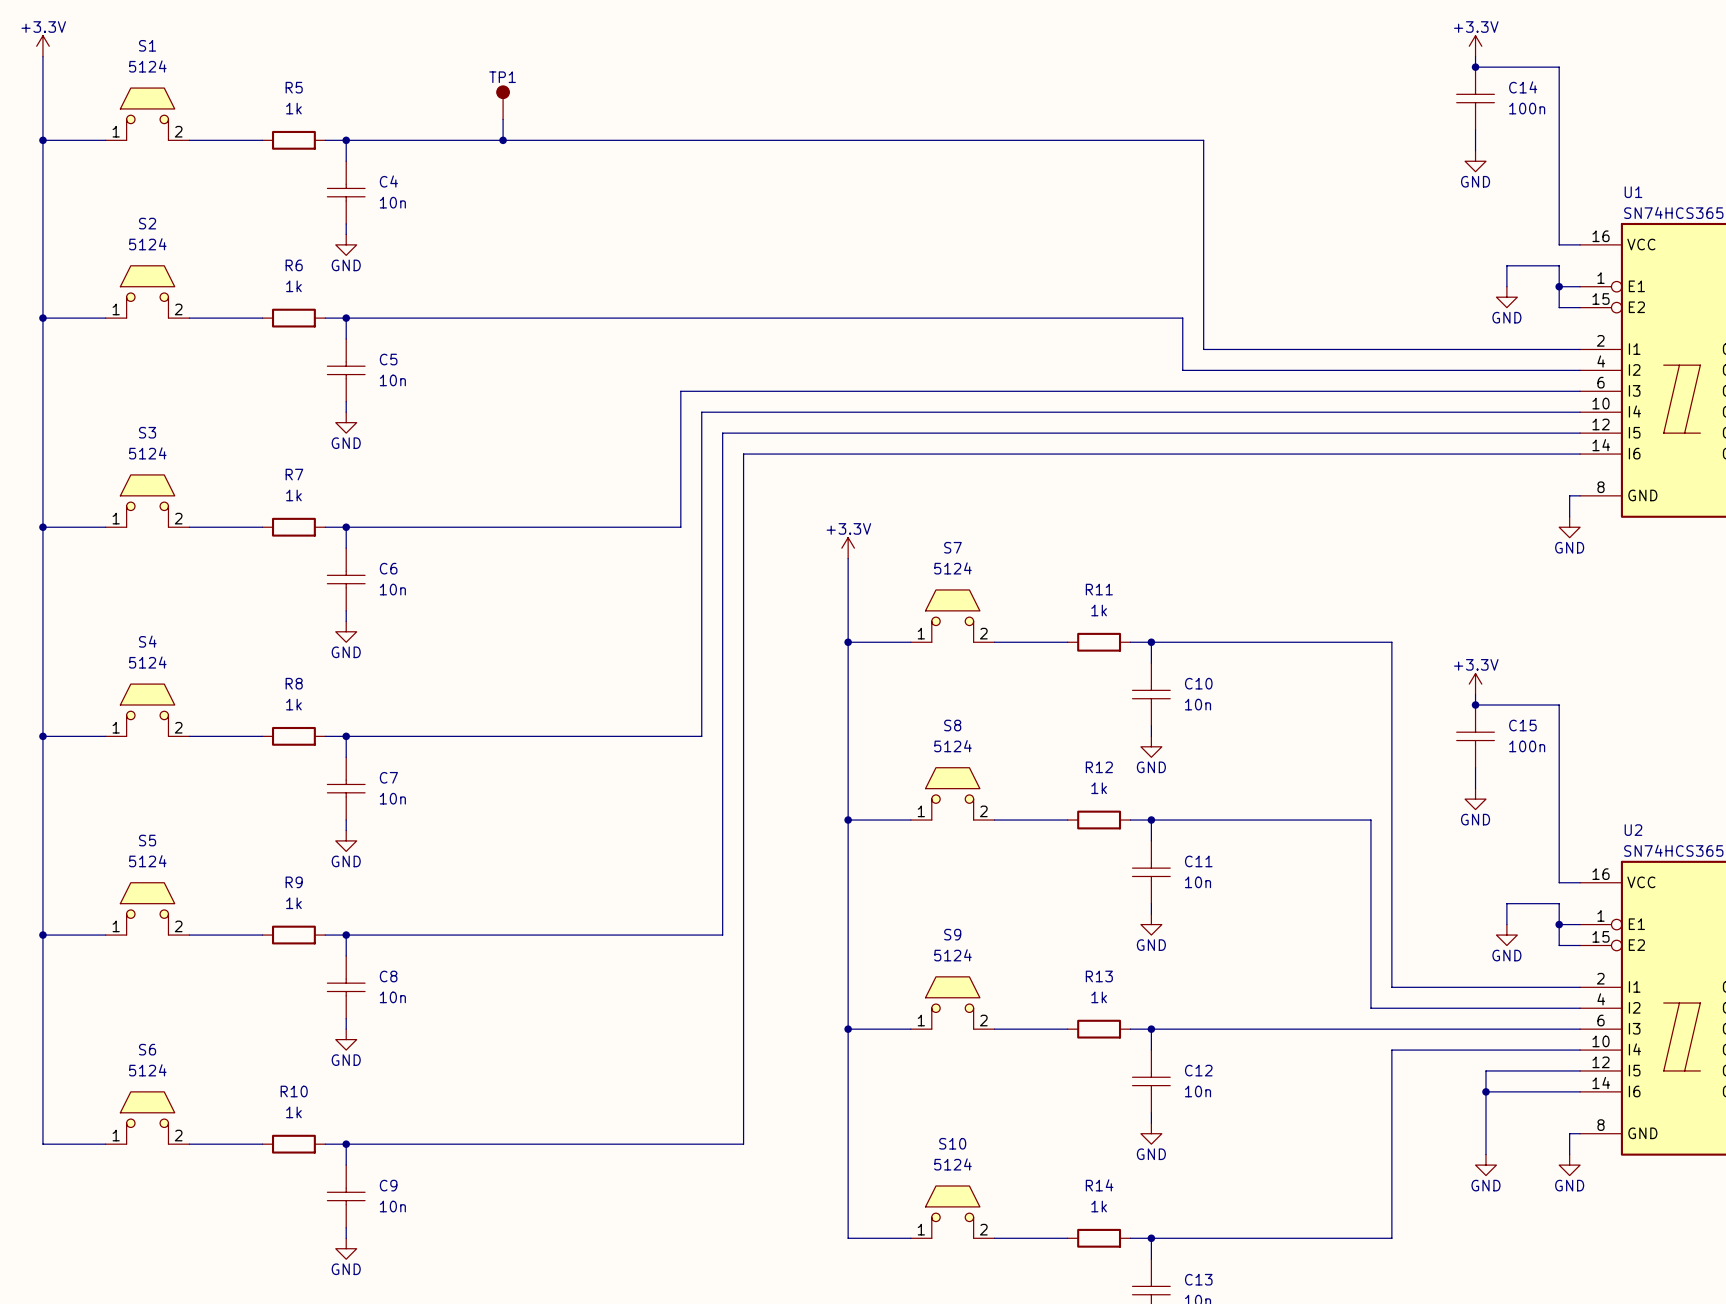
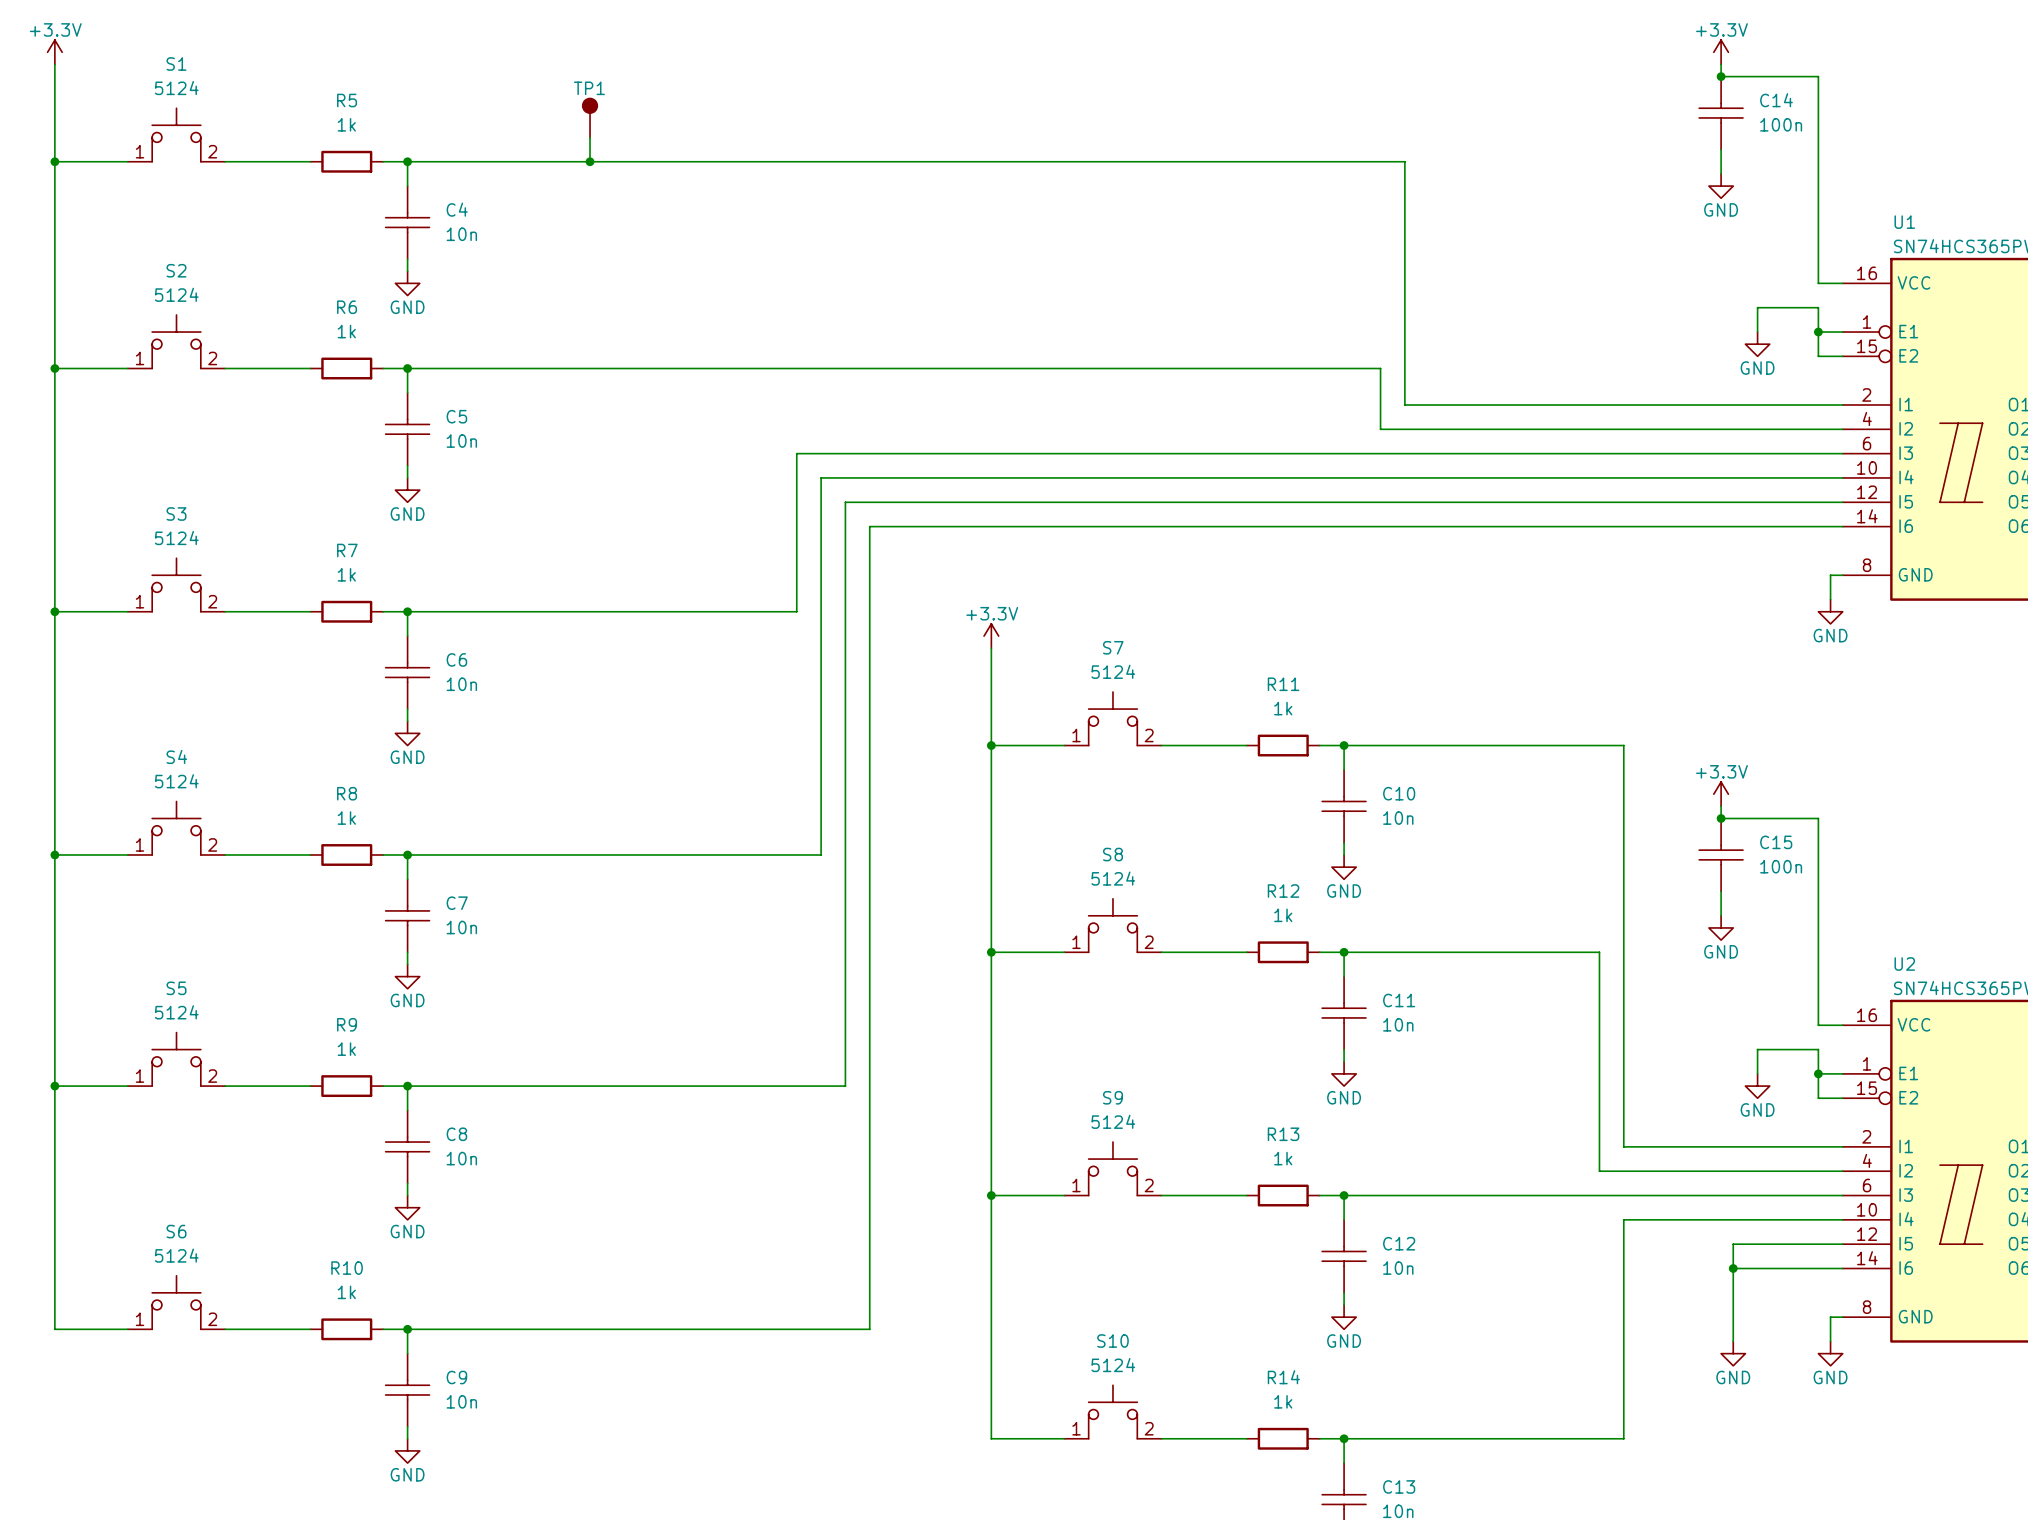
S1 symbol: [105, 88, 190, 141] -> [127, 108, 226, 162]
S2 symbol: [105, 265, 190, 319] -> [127, 314, 226, 369]
S3 symbol: [105, 474, 190, 528] -> [127, 558, 226, 612]
S7 symbol: [910, 589, 995, 643] -> [1064, 692, 1162, 746]
S4 symbol: [105, 684, 190, 737] -> [127, 801, 226, 855]
S8 symbol: [910, 767, 995, 821] -> [1064, 898, 1162, 953]
S5 symbol: [105, 882, 190, 936] -> [127, 1032, 226, 1087]
S9 symbol: [910, 976, 995, 1030] -> [1064, 1142, 1162, 1196]
S6 symbol: [105, 1091, 190, 1145] -> [127, 1275, 226, 1330]
S10 symbol: [910, 1186, 995, 1239] -> [1064, 1385, 1162, 1439]

